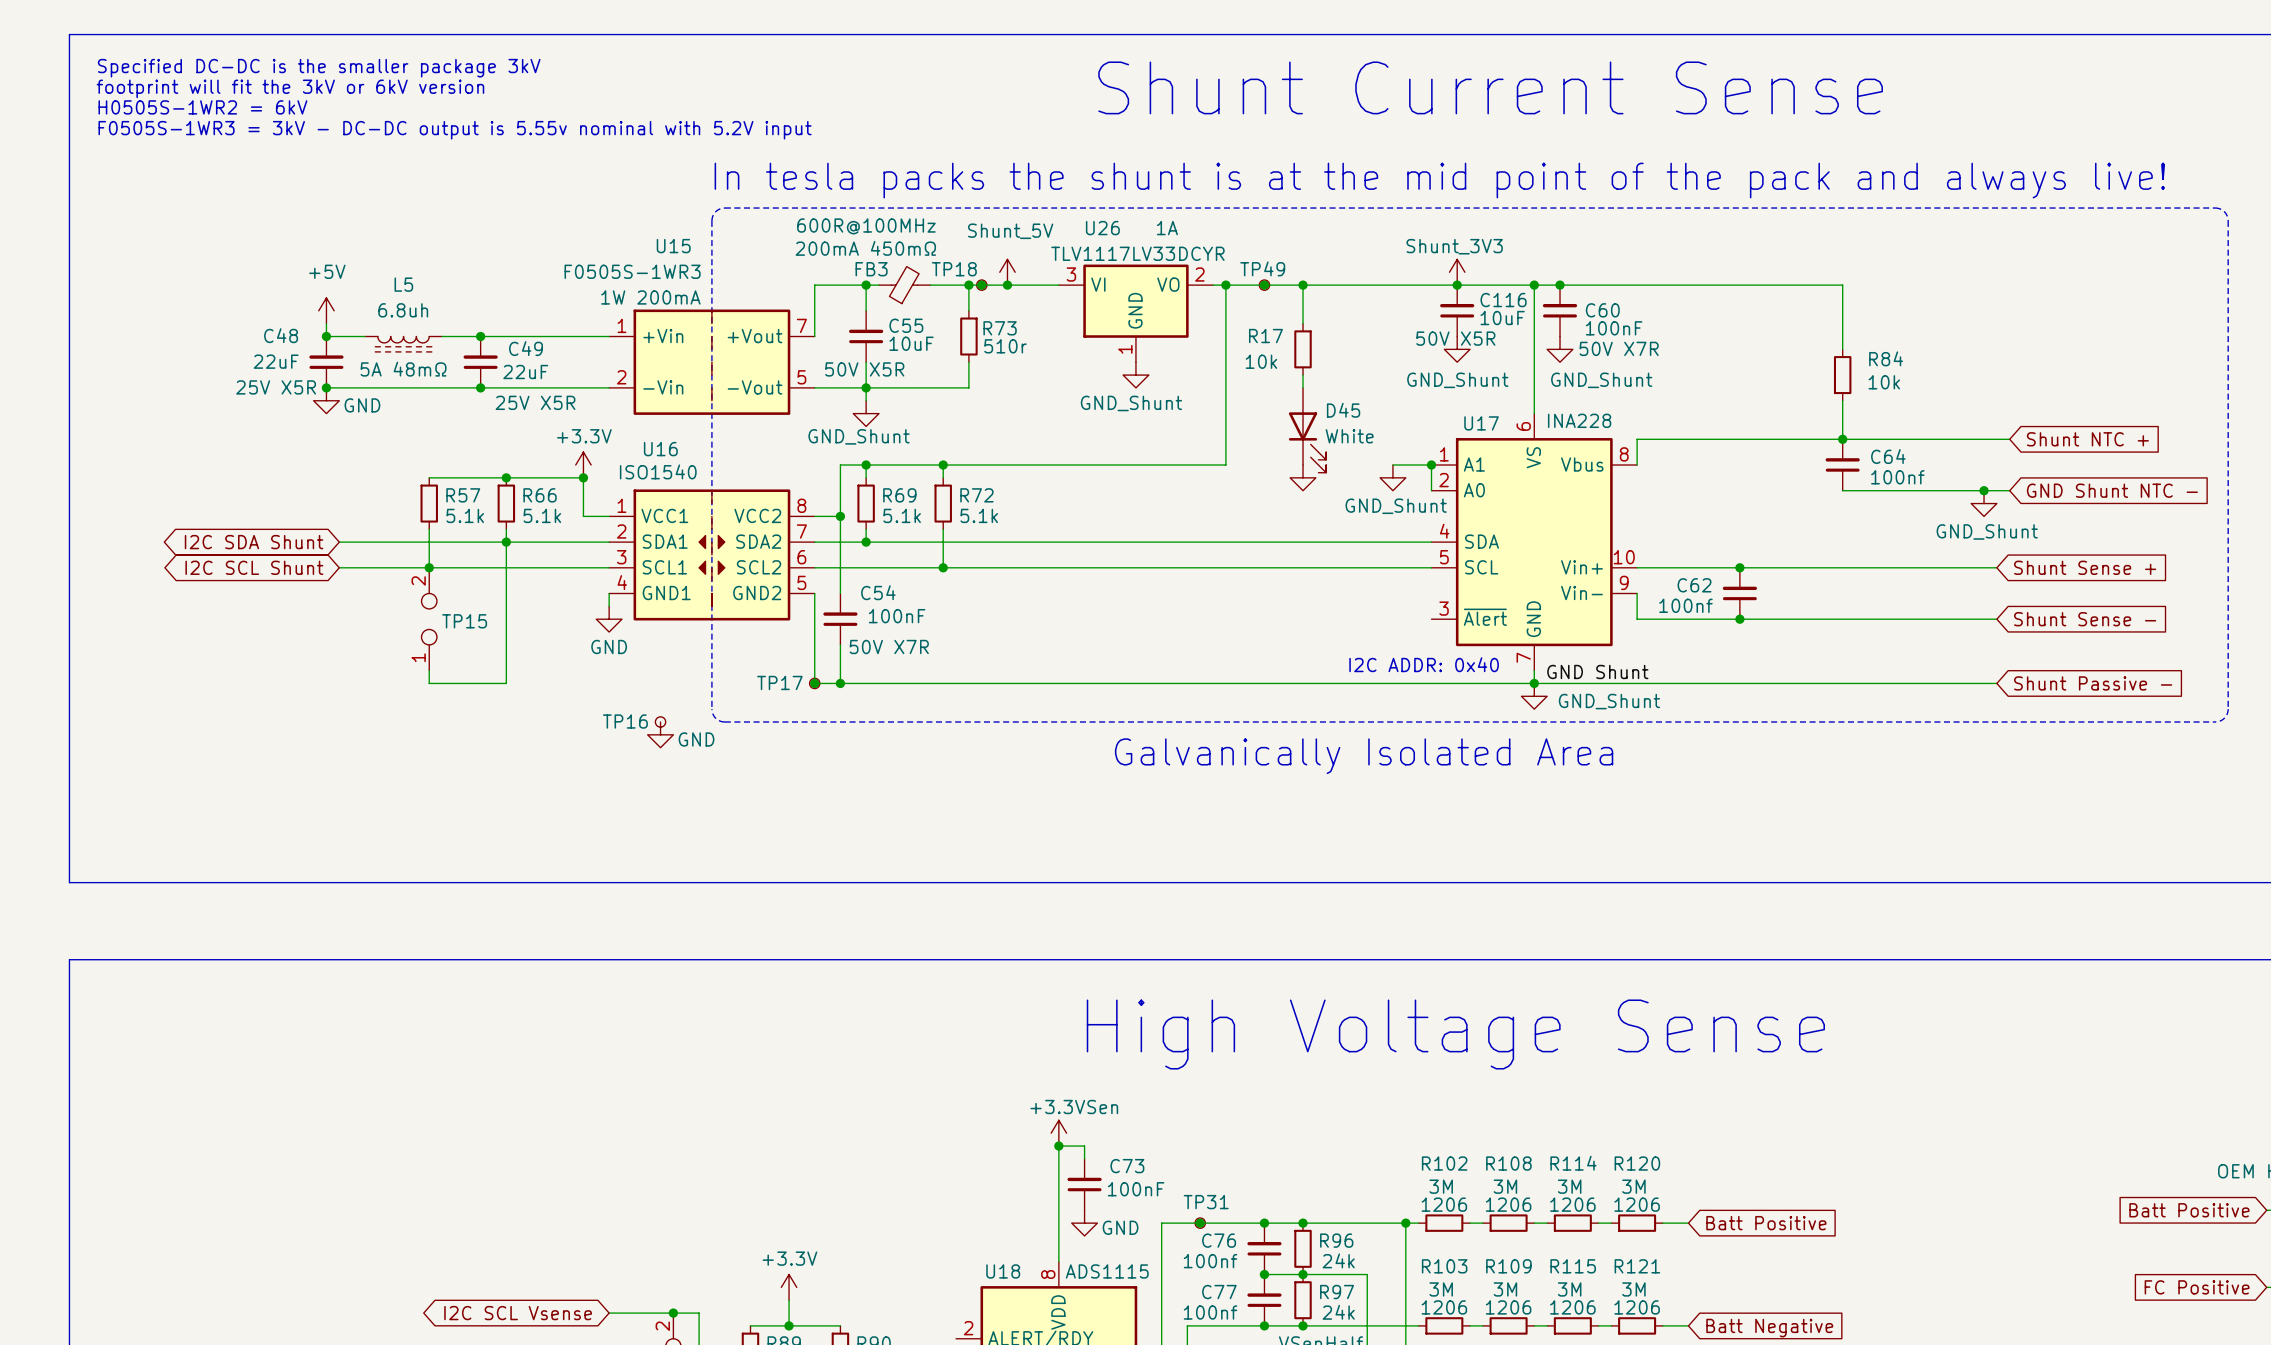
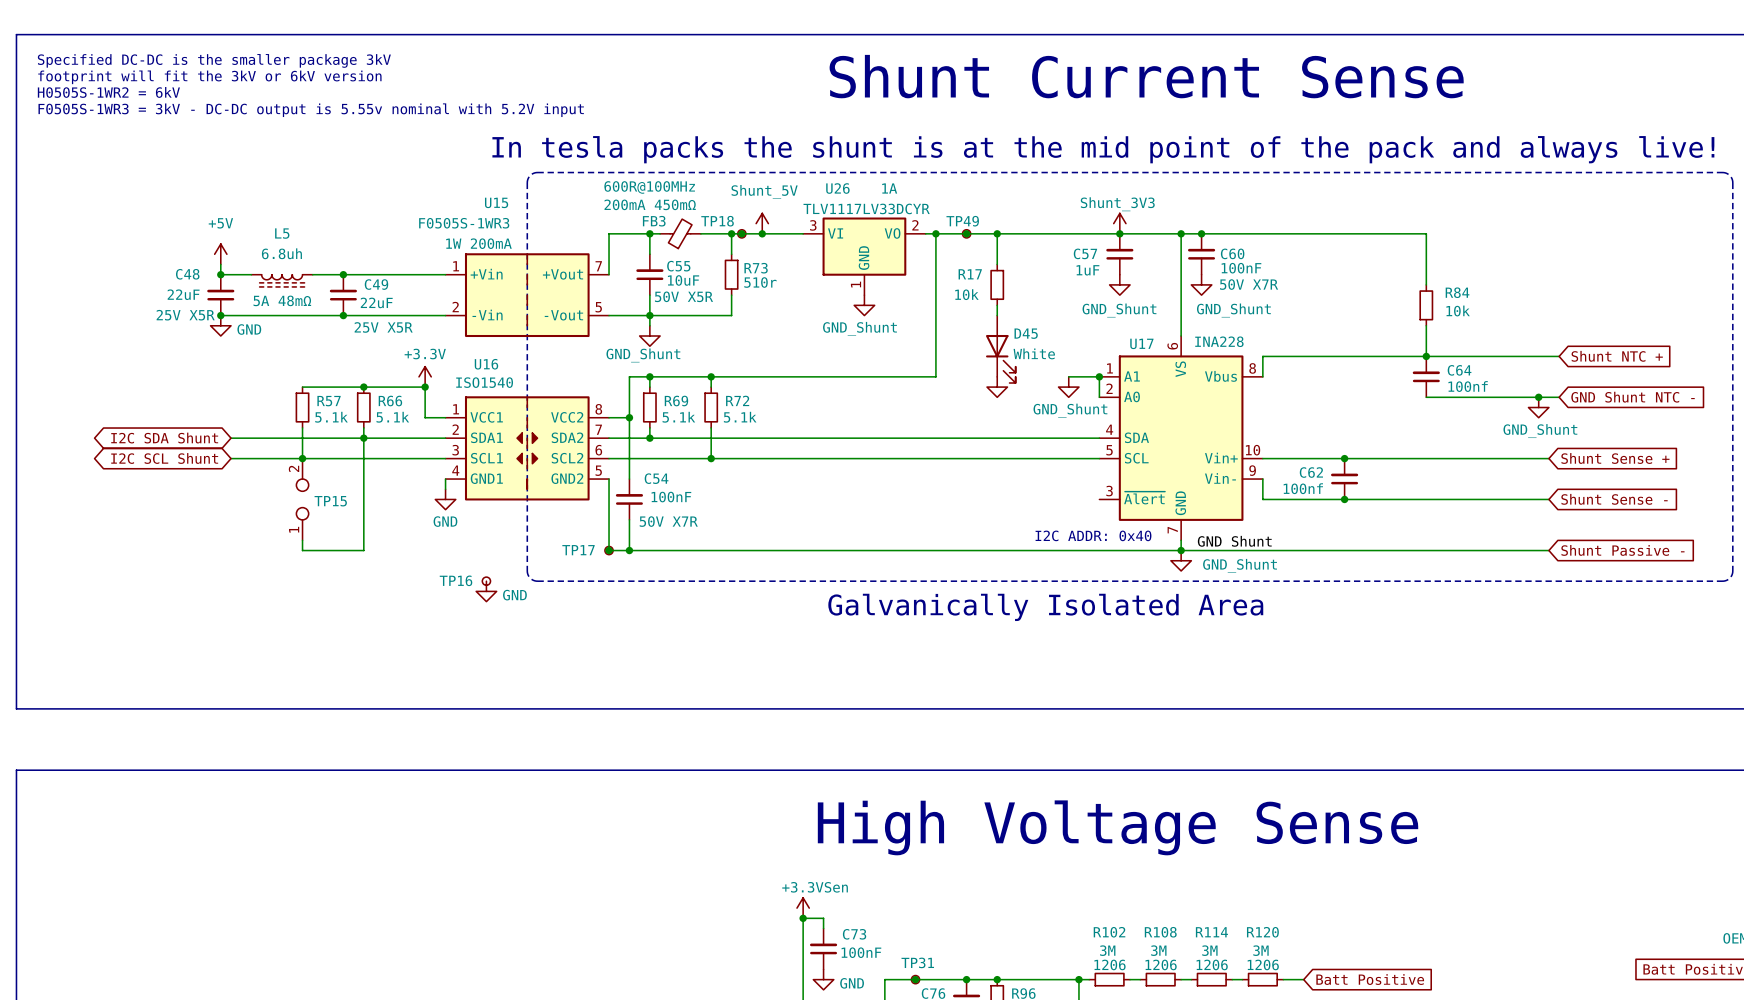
C116 name: C116 (1503, 300) -> C57 (1085, 253)
C116 value: 10uF (1502, 318) -> 1uF (1087, 270)
C116 text: 50V X5R (1455, 338) -> none
C55 text position: 50V X5R (864, 369) -> 50V X5R (683, 296)

